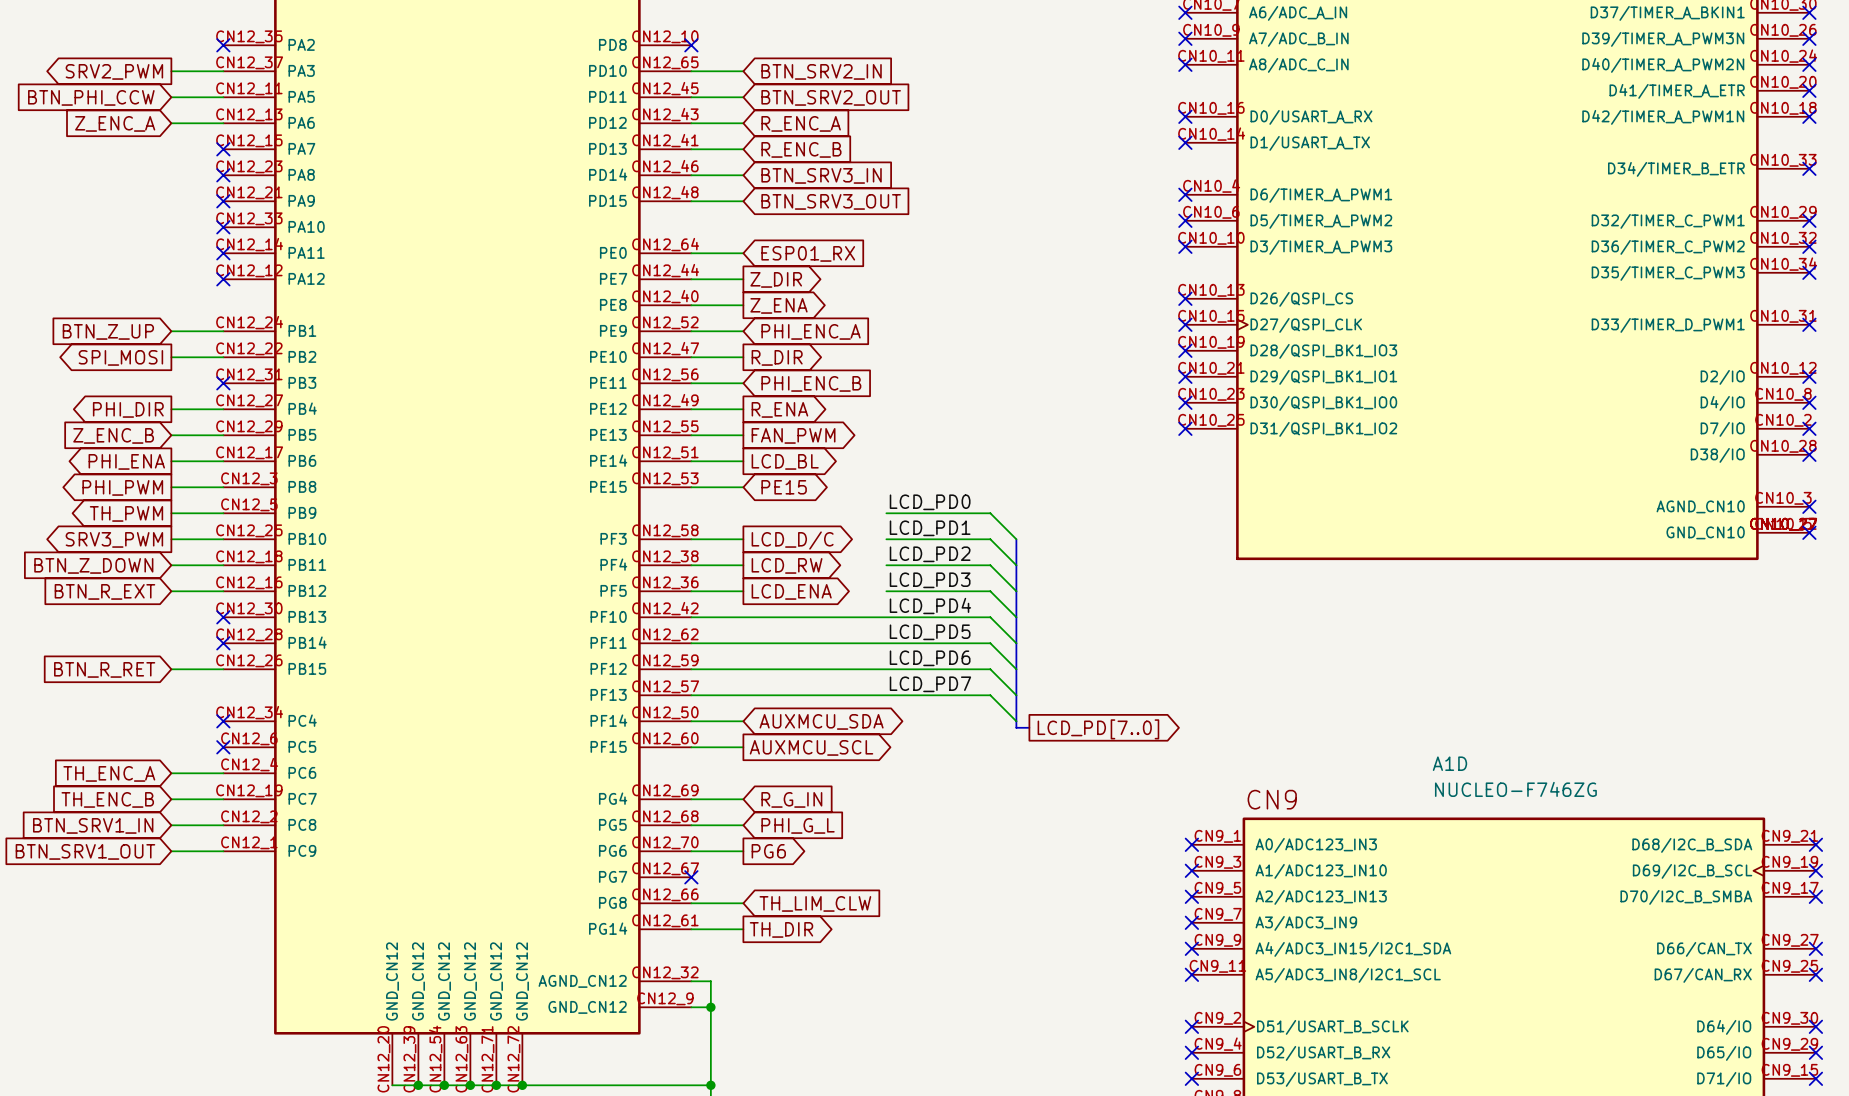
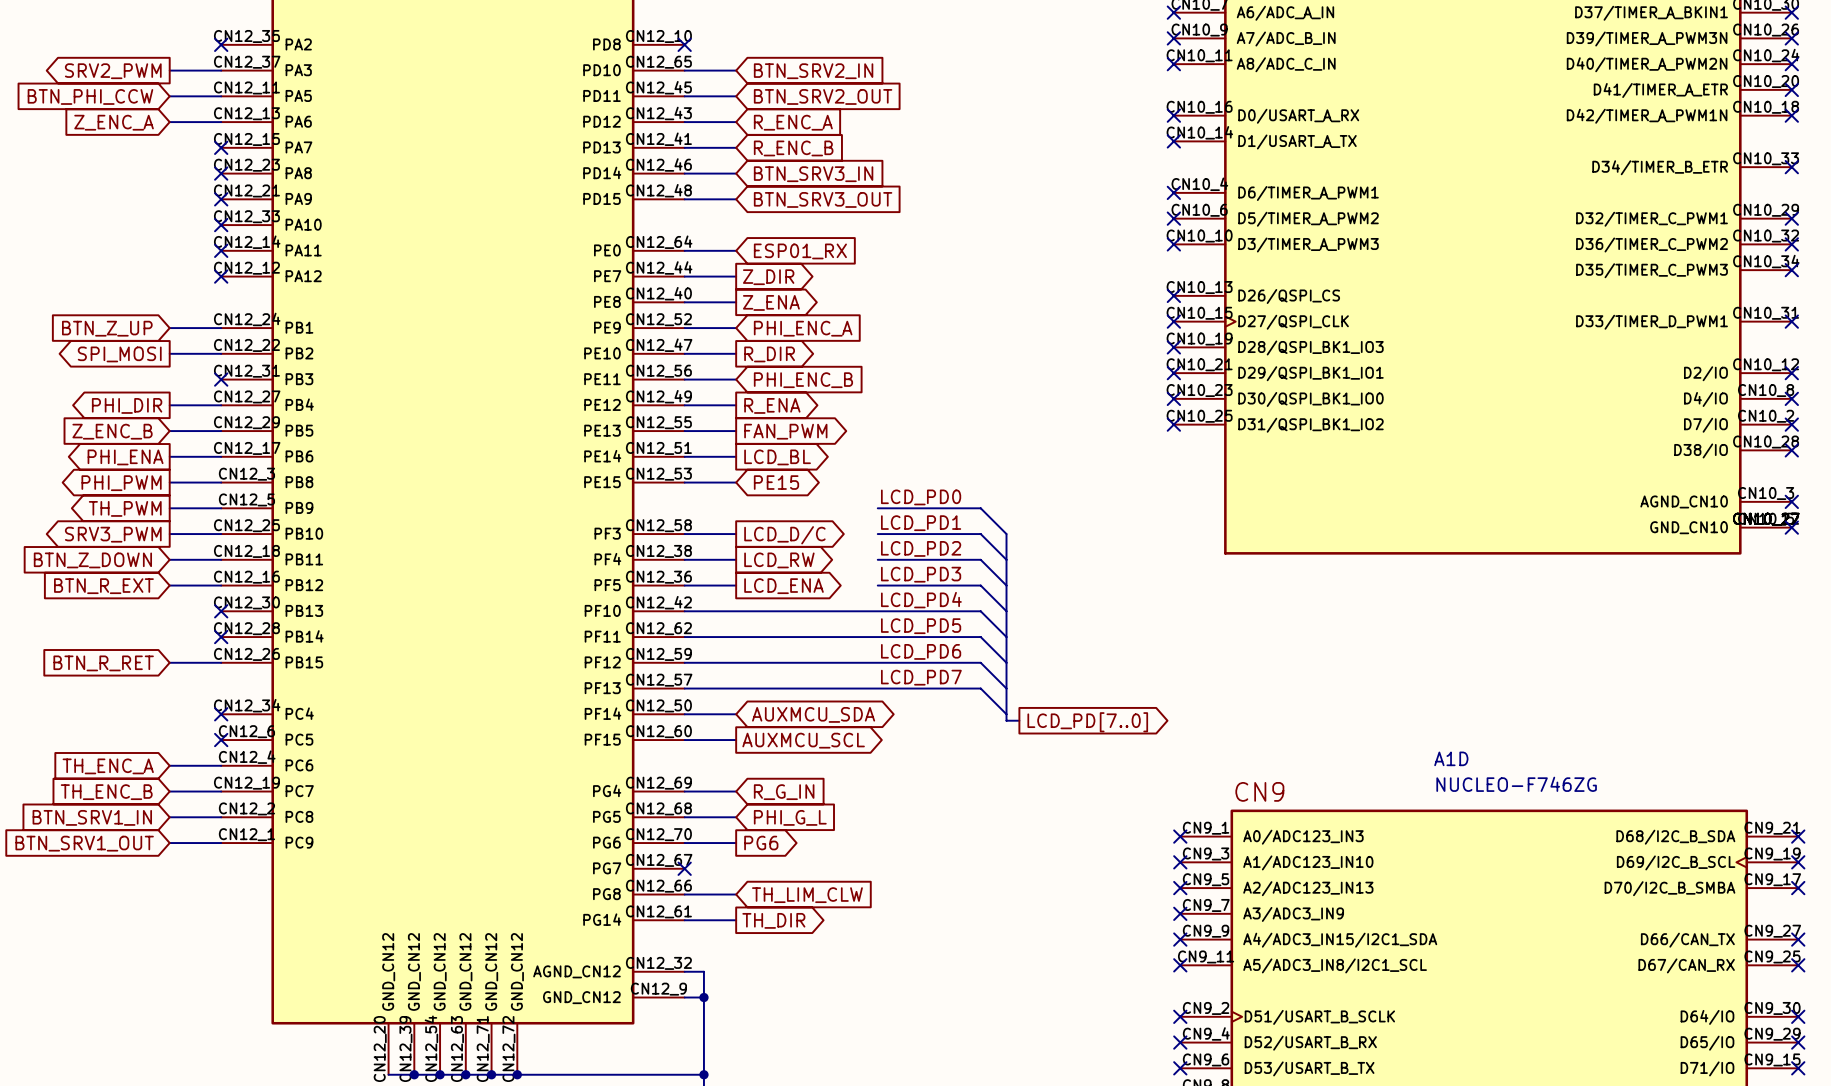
A1D name position: A1D (1449, 763) -> A1D (1451, 758)
A1D value position: NUCLEO-F746ZG (1515, 789) -> NUCLEO-F746ZG (1516, 784)

